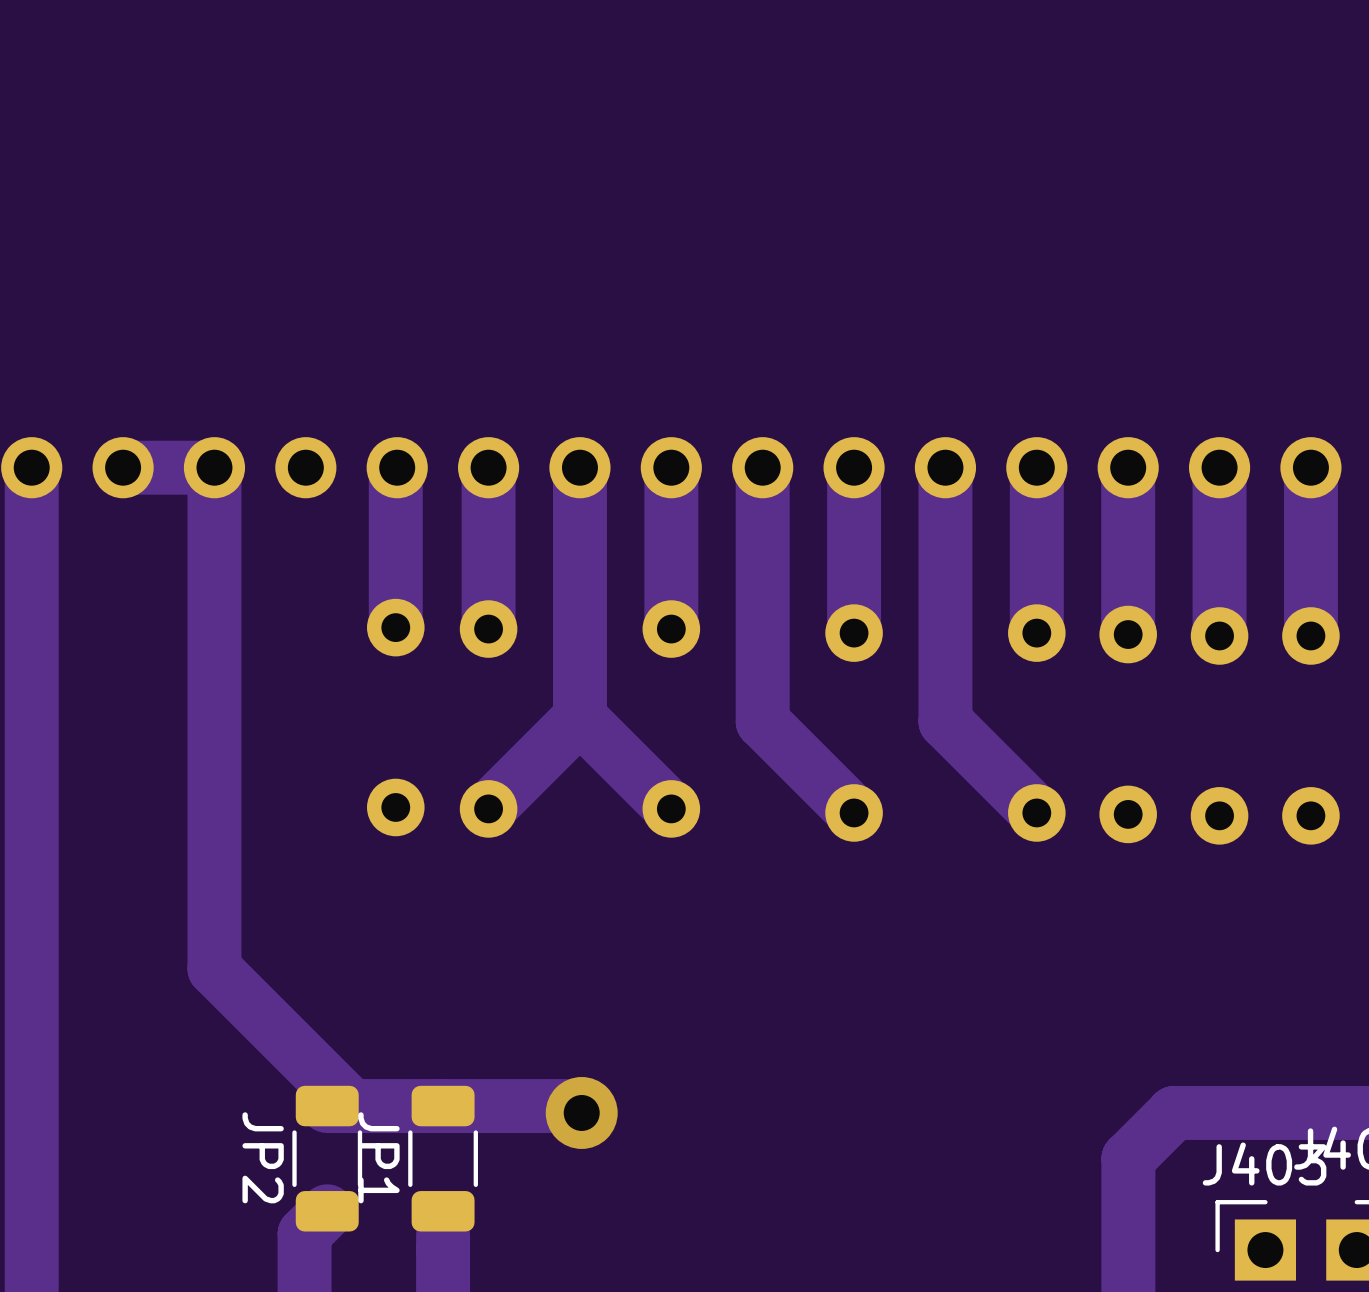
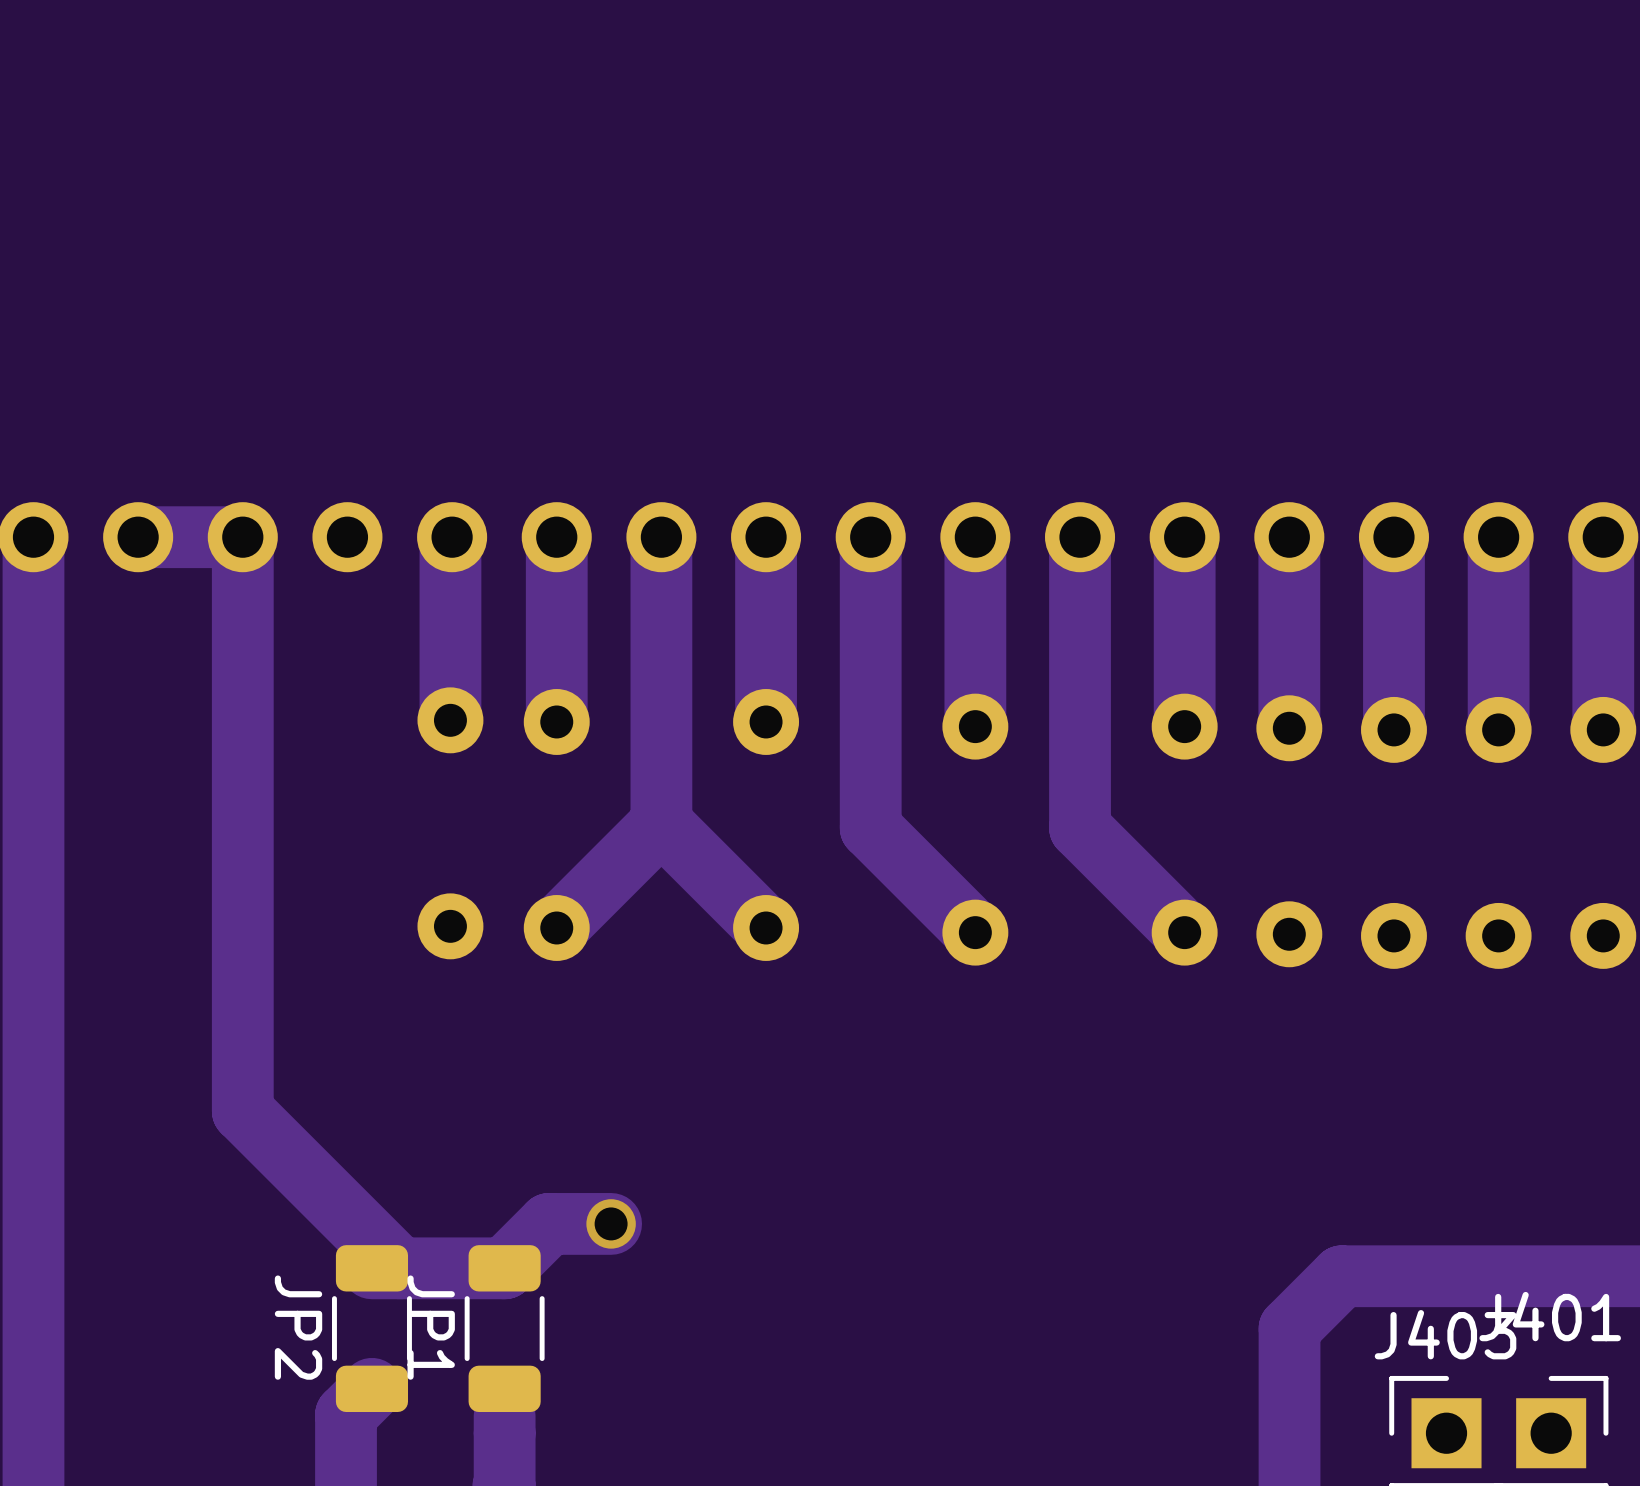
via: none -> (611, 1223)
track: (443, 1106) (574, 1106) (581, 1112) -> (504, 1268) (549, 1223) (611, 1223)
via: (581, 1112) -> none

